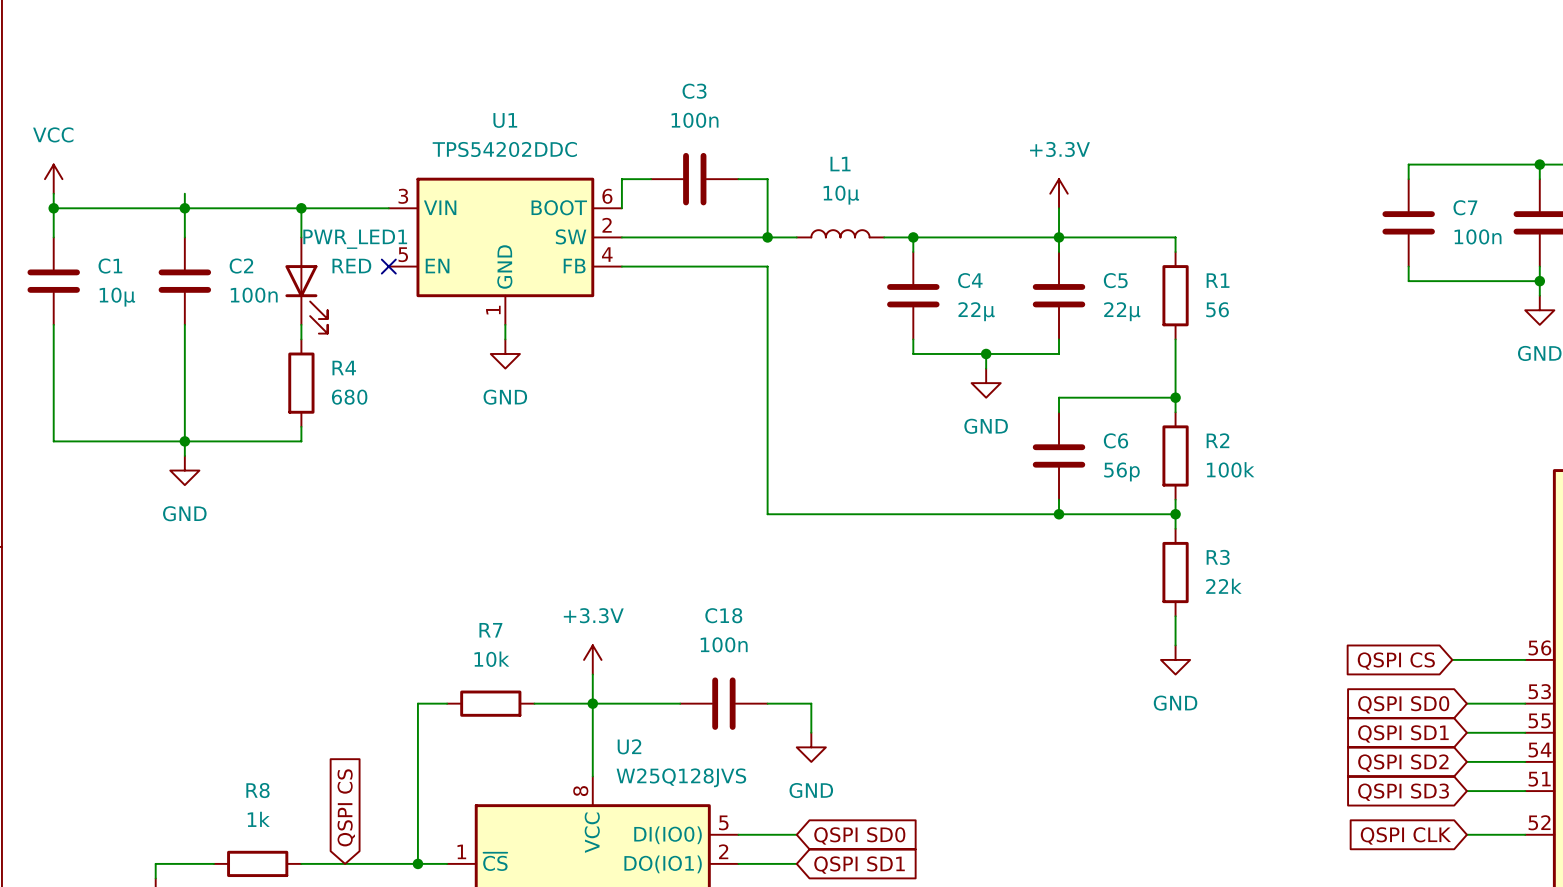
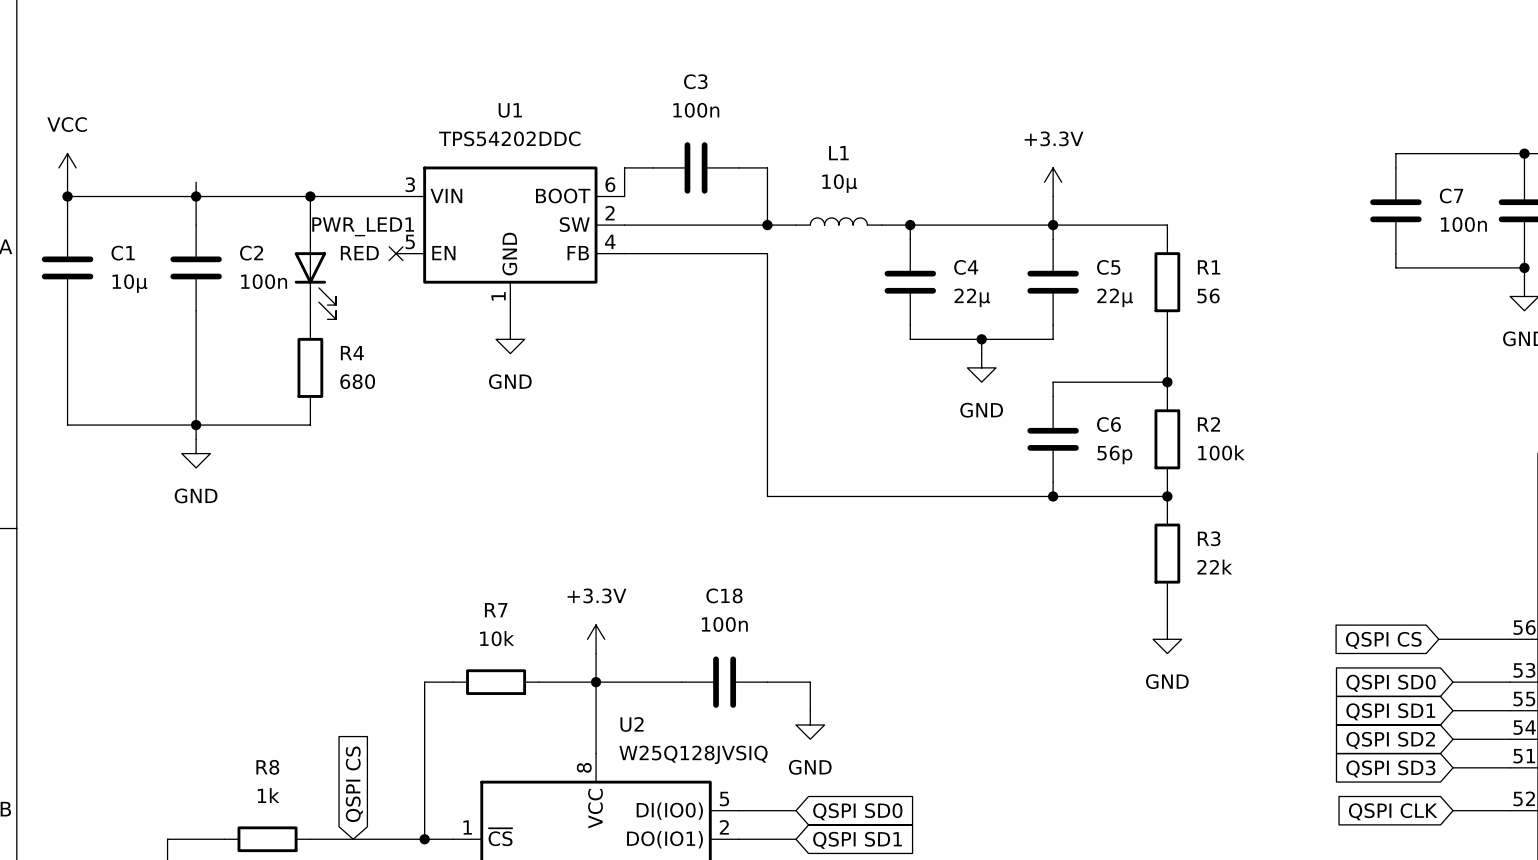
U2 value: W25Q128JVS (681, 777) -> W25Q128JVSIQ (693, 754)

